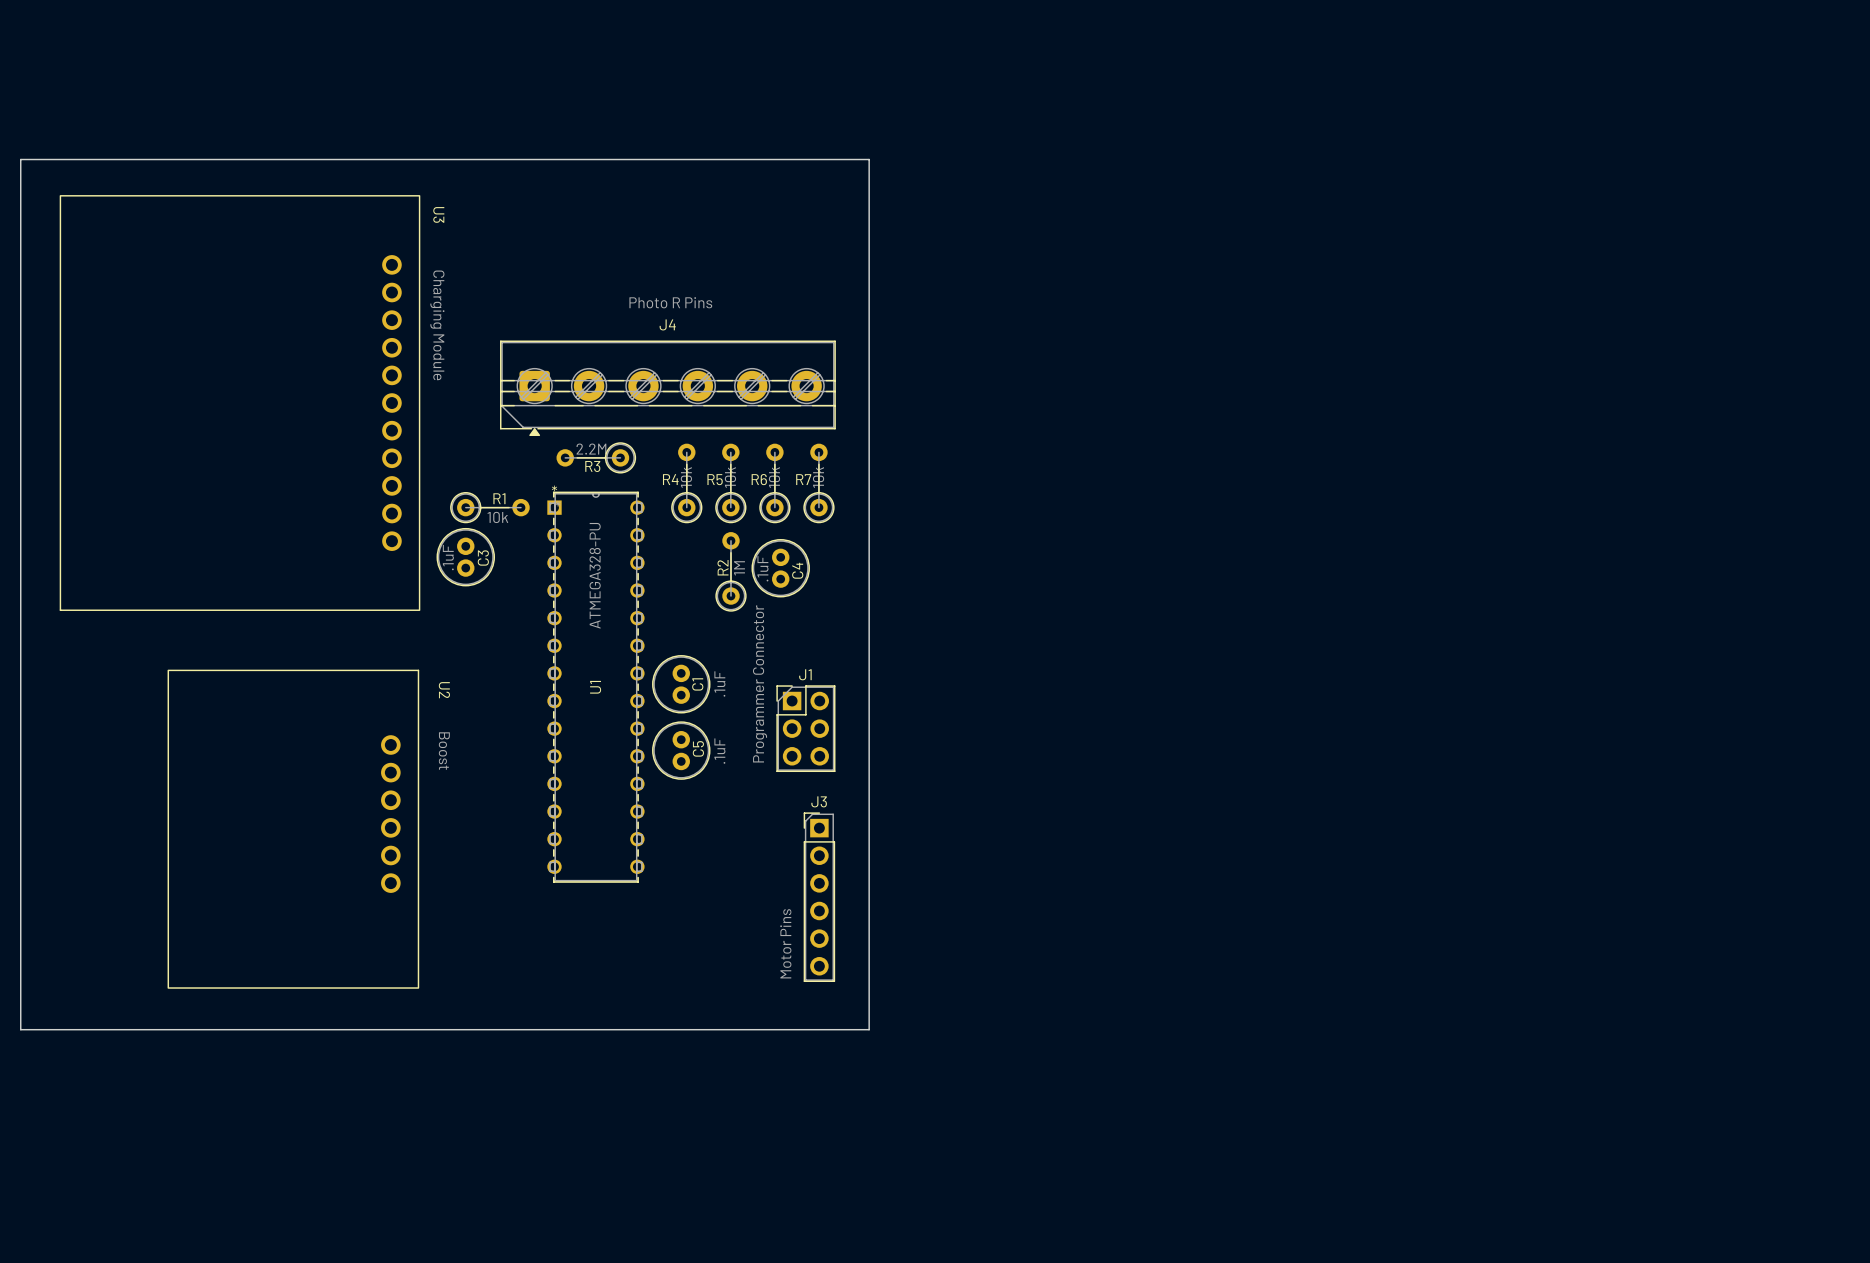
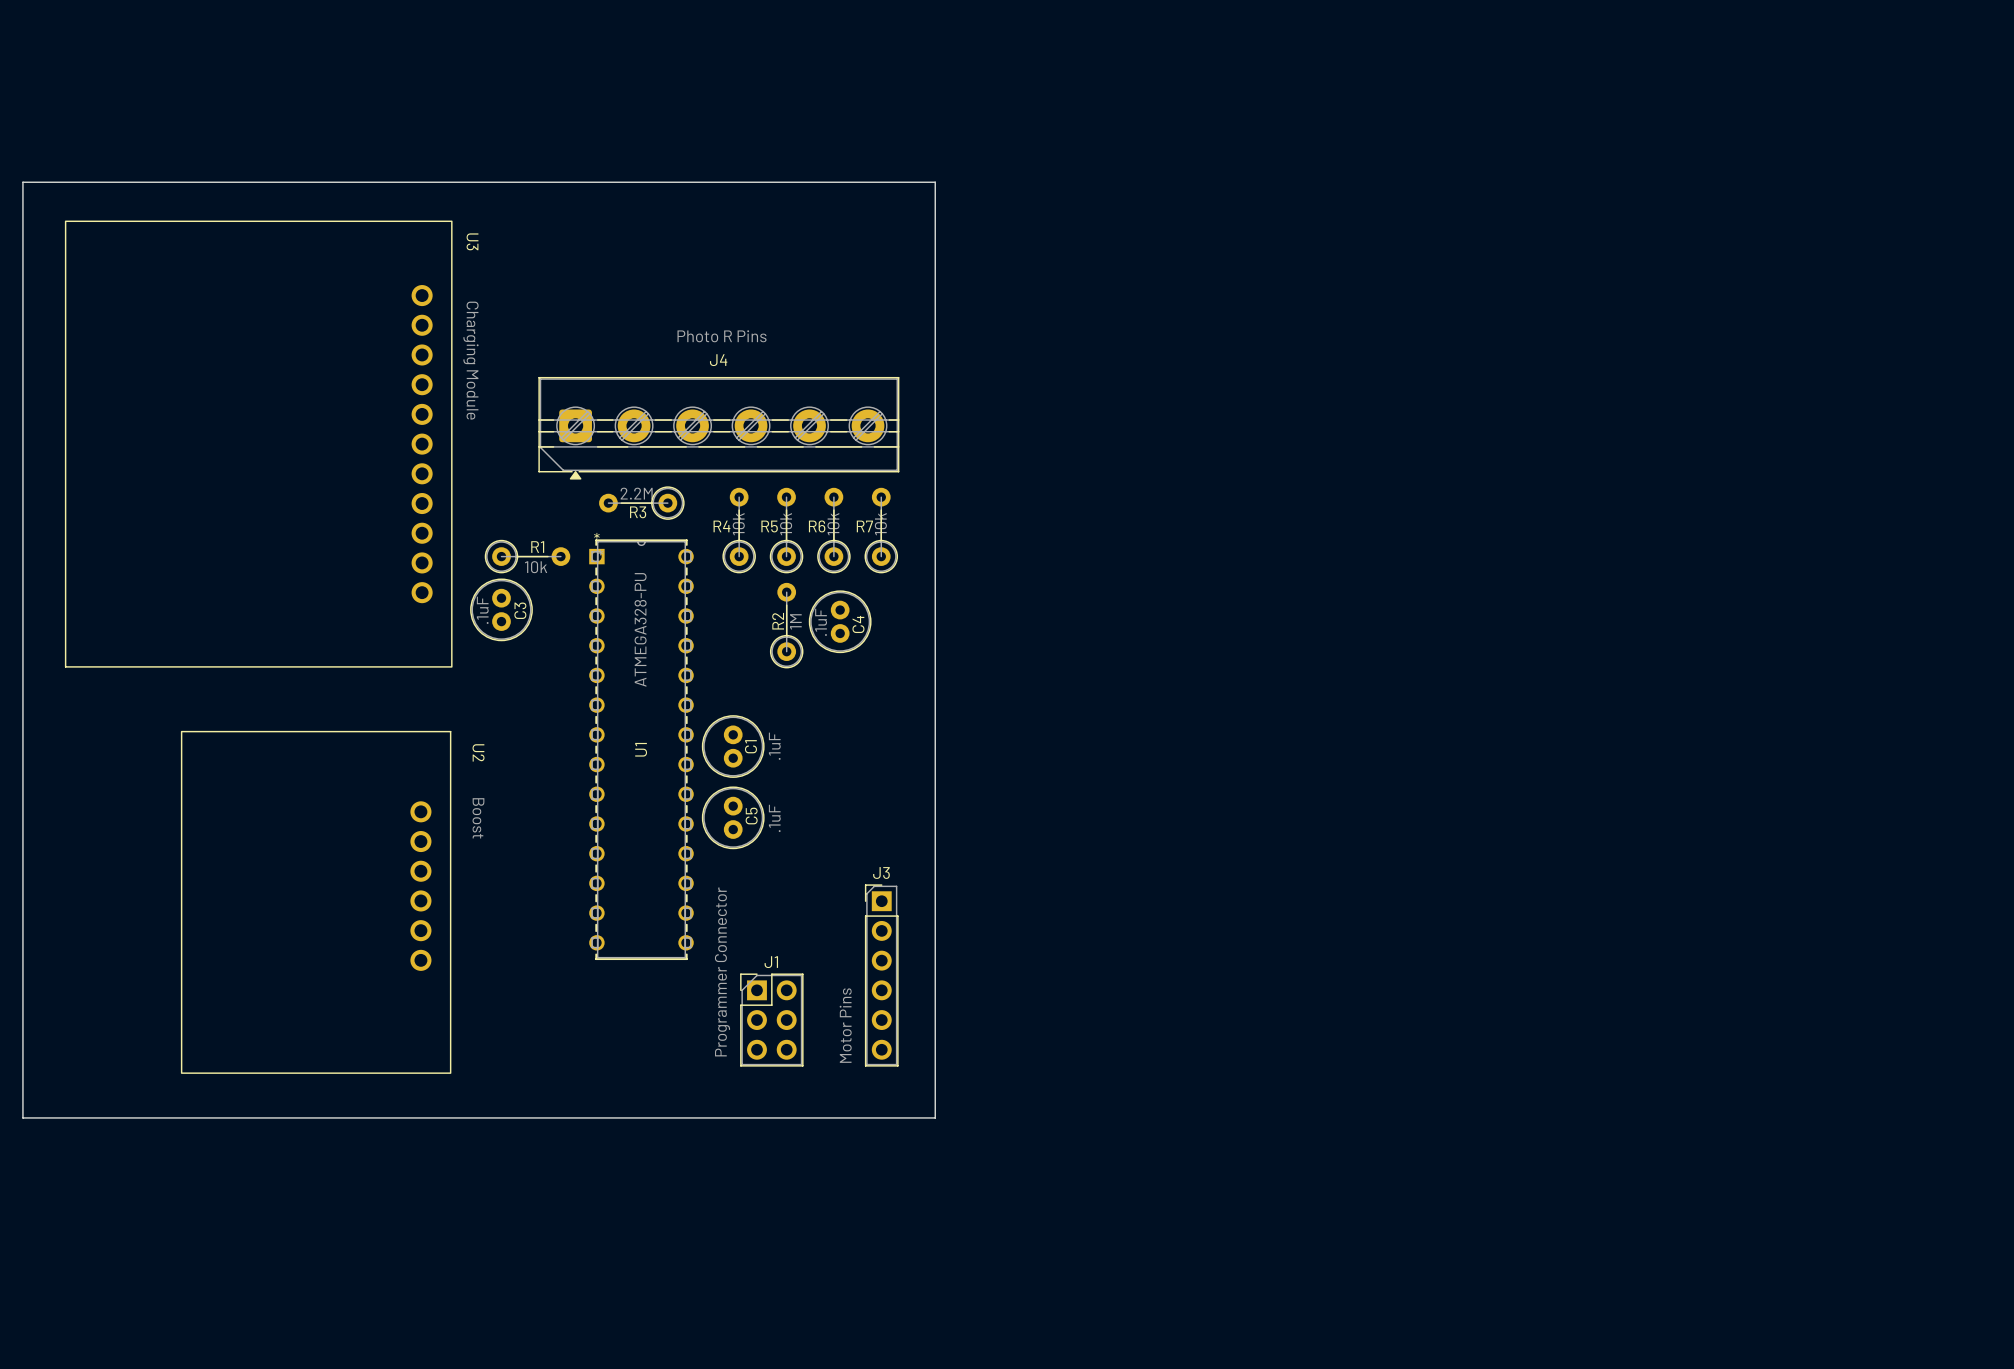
J1 position: (805, 728) -> (771, 1020)

